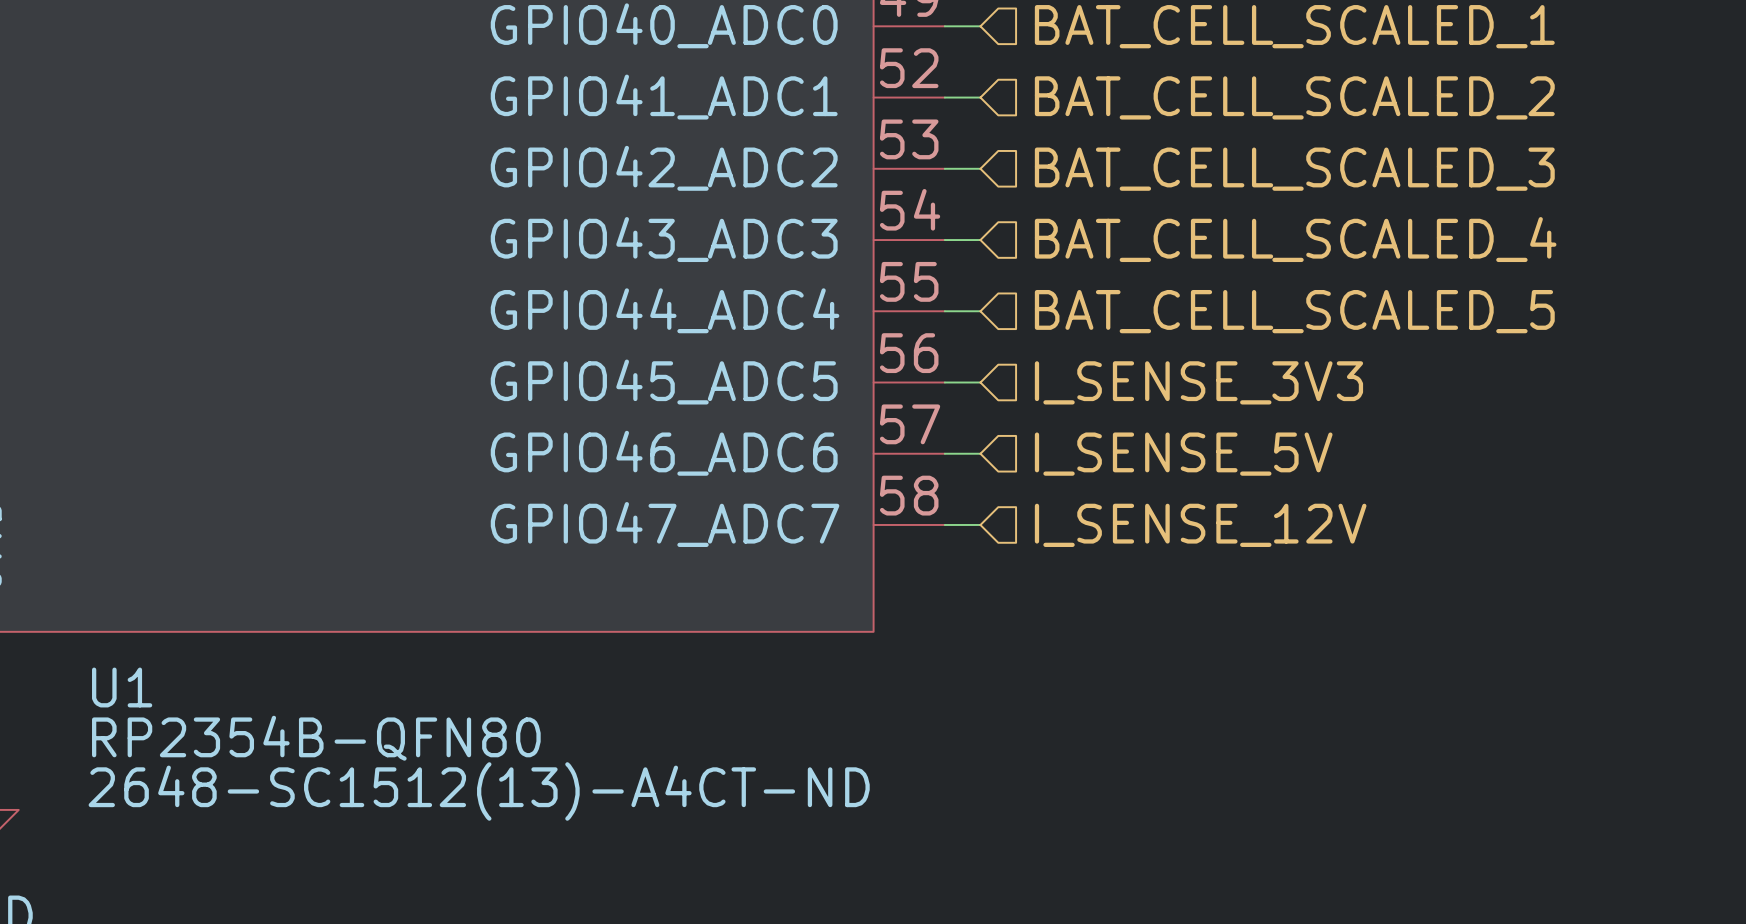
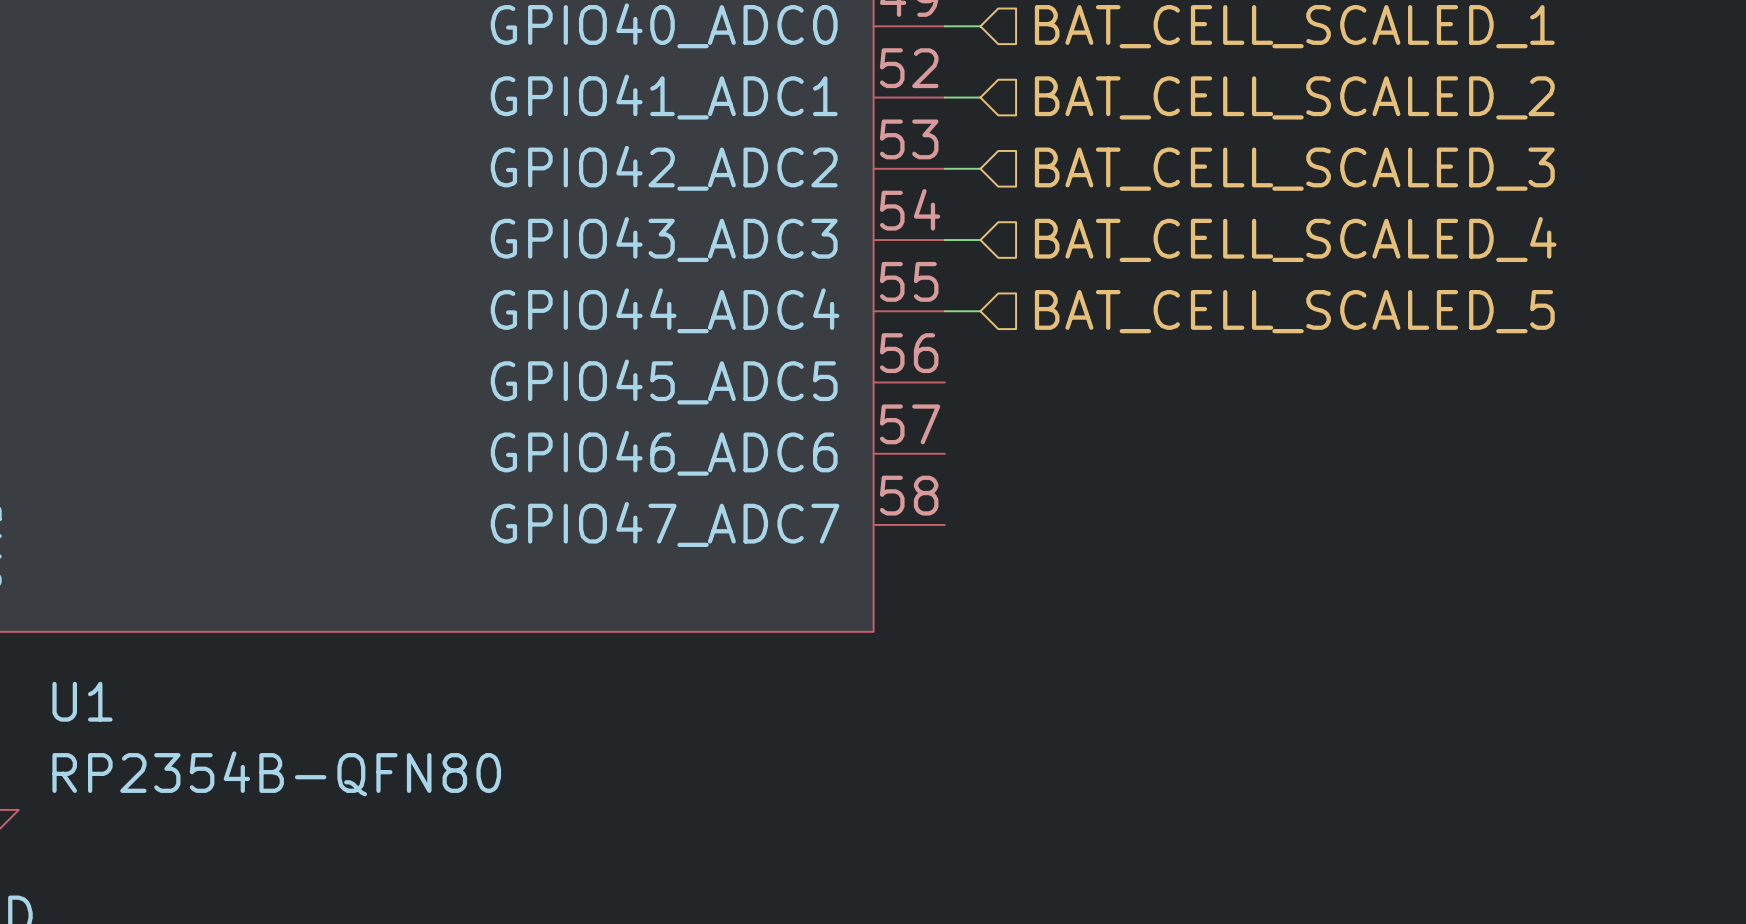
wire: (944, 382) (980, 382) -> none
hierarchical label: I_SENSE_3V3 (1198, 382) -> none
wire: (944, 453) (980, 453) -> none
hierarchical label: I_SENSE_5V (1183, 454) -> none
wire: (944, 524) (980, 524) -> none
hierarchical label: I_SENSE_12V (1200, 525) -> none
U1 name position: U1 (122, 687) -> U1 (82, 701)
U1 value position: RP2354B-QFN80 (316, 738) -> RP2354B-QFN80 (276, 773)
U1 text: 2648-SC1512(13)-A4CT-ND (479, 791) -> none

